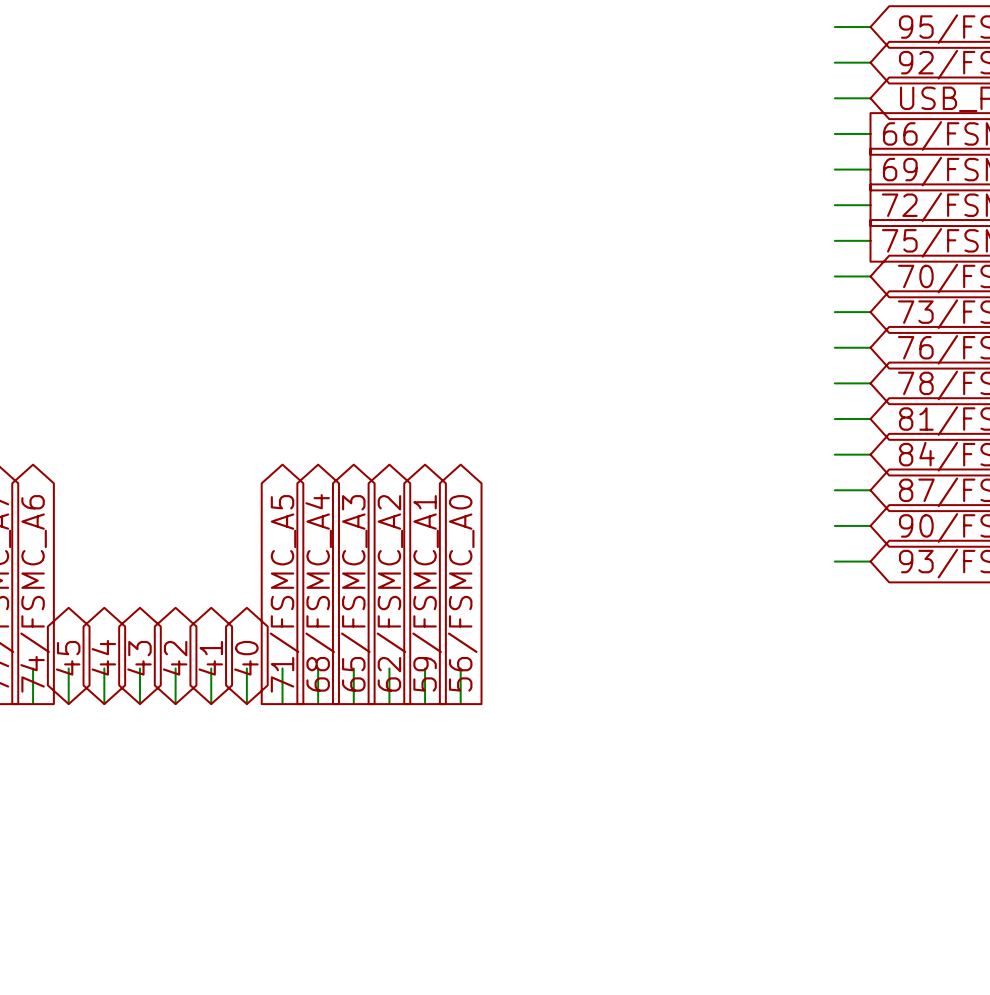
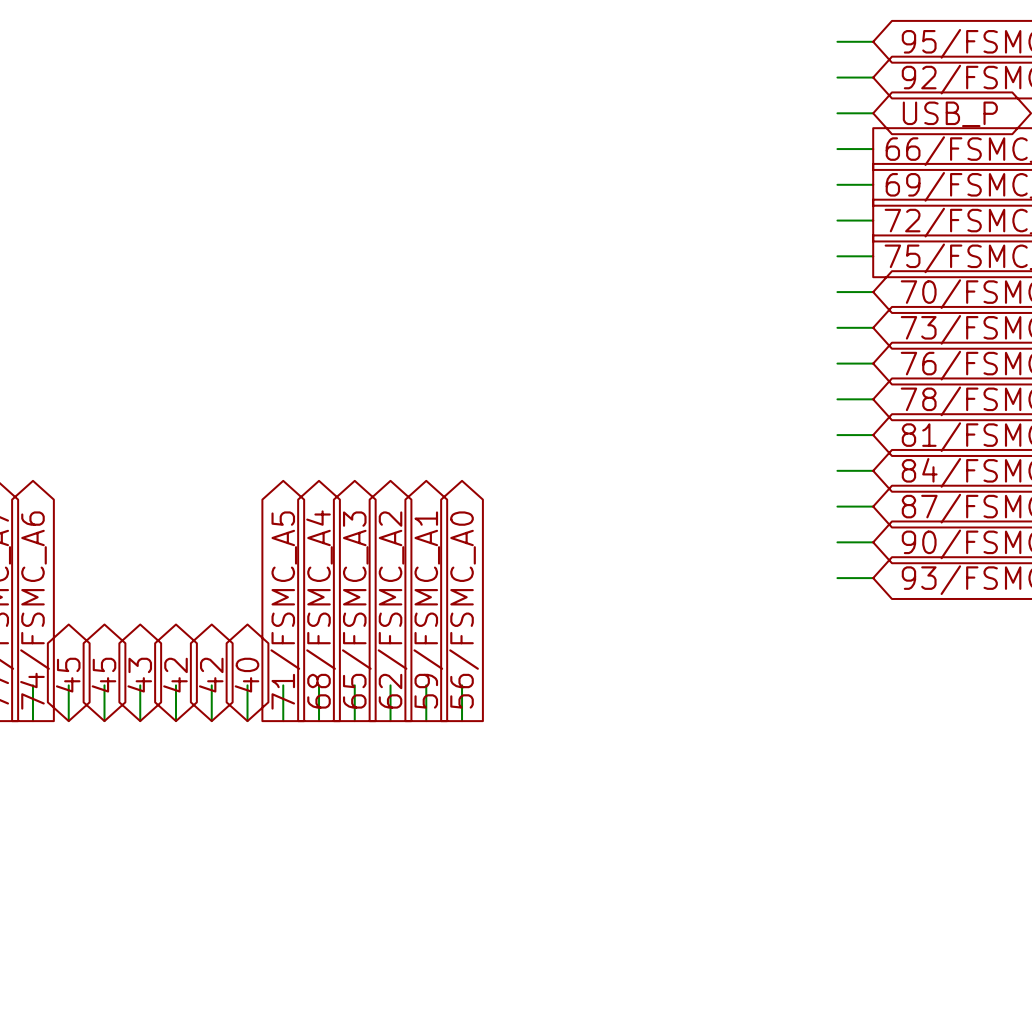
global label: 44 (103, 657) -> 45 (103, 675)
global label: 41 (210, 658) -> 42 (211, 675)

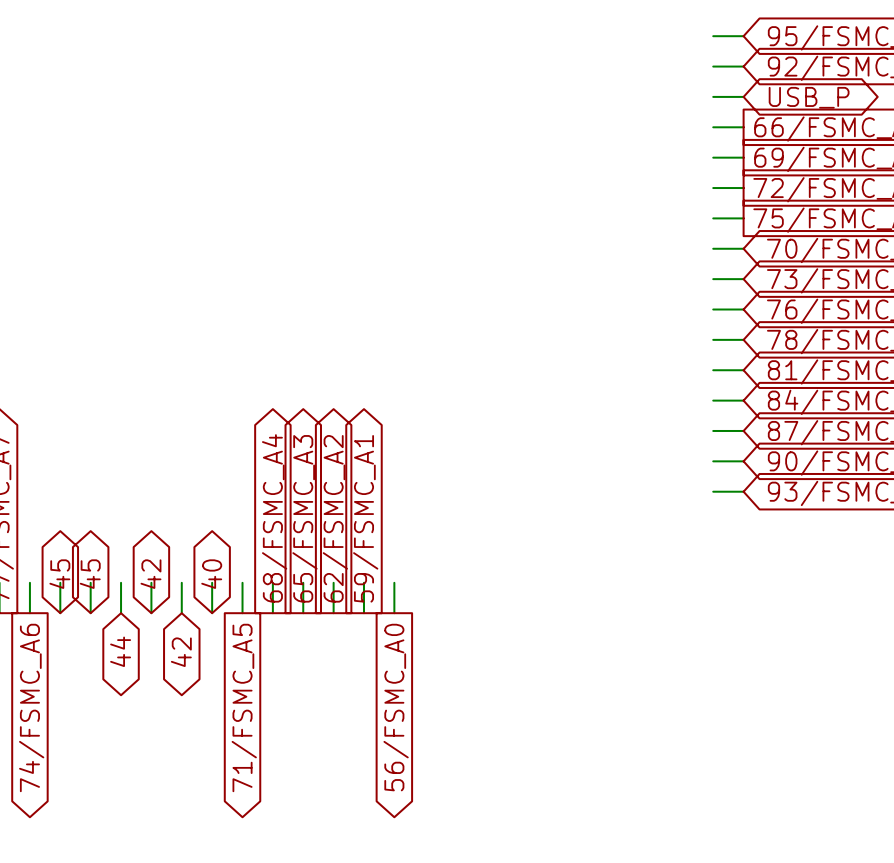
global label rotation: 0° (35, 610) -> 180° (31, 707)
global label rotation: 0° (285, 610) -> 180° (244, 707)
global label rotation: 0° (464, 610) -> 180° (396, 707)
global label: 43 (139, 675) -> 44 (120, 651)
global label rotation: 0° (211, 675) -> 180° (181, 652)

